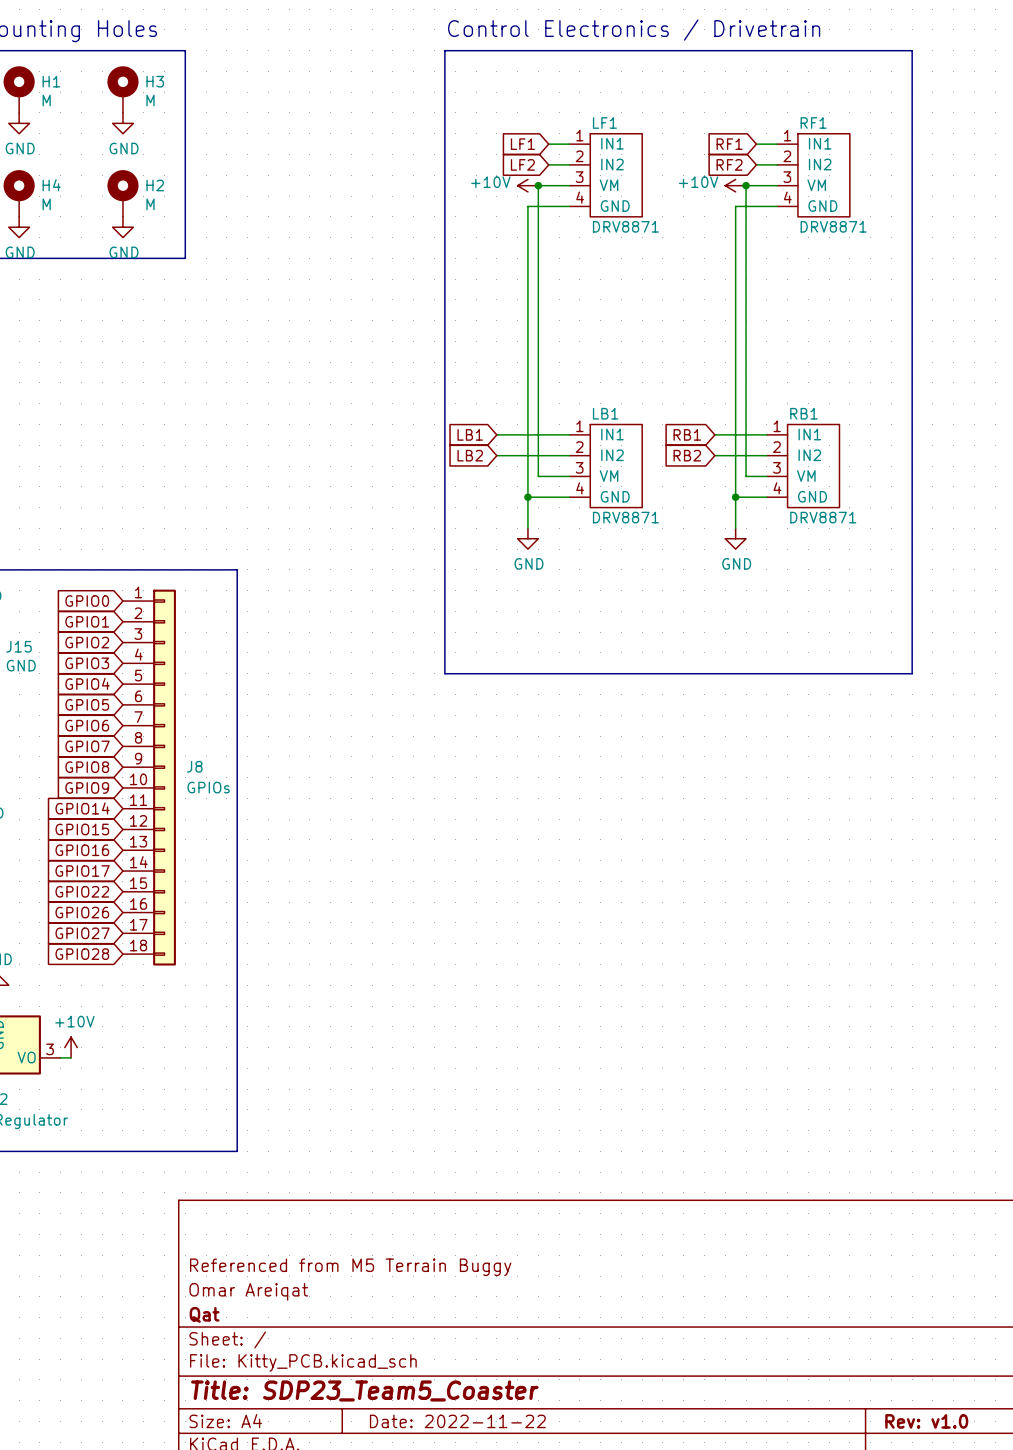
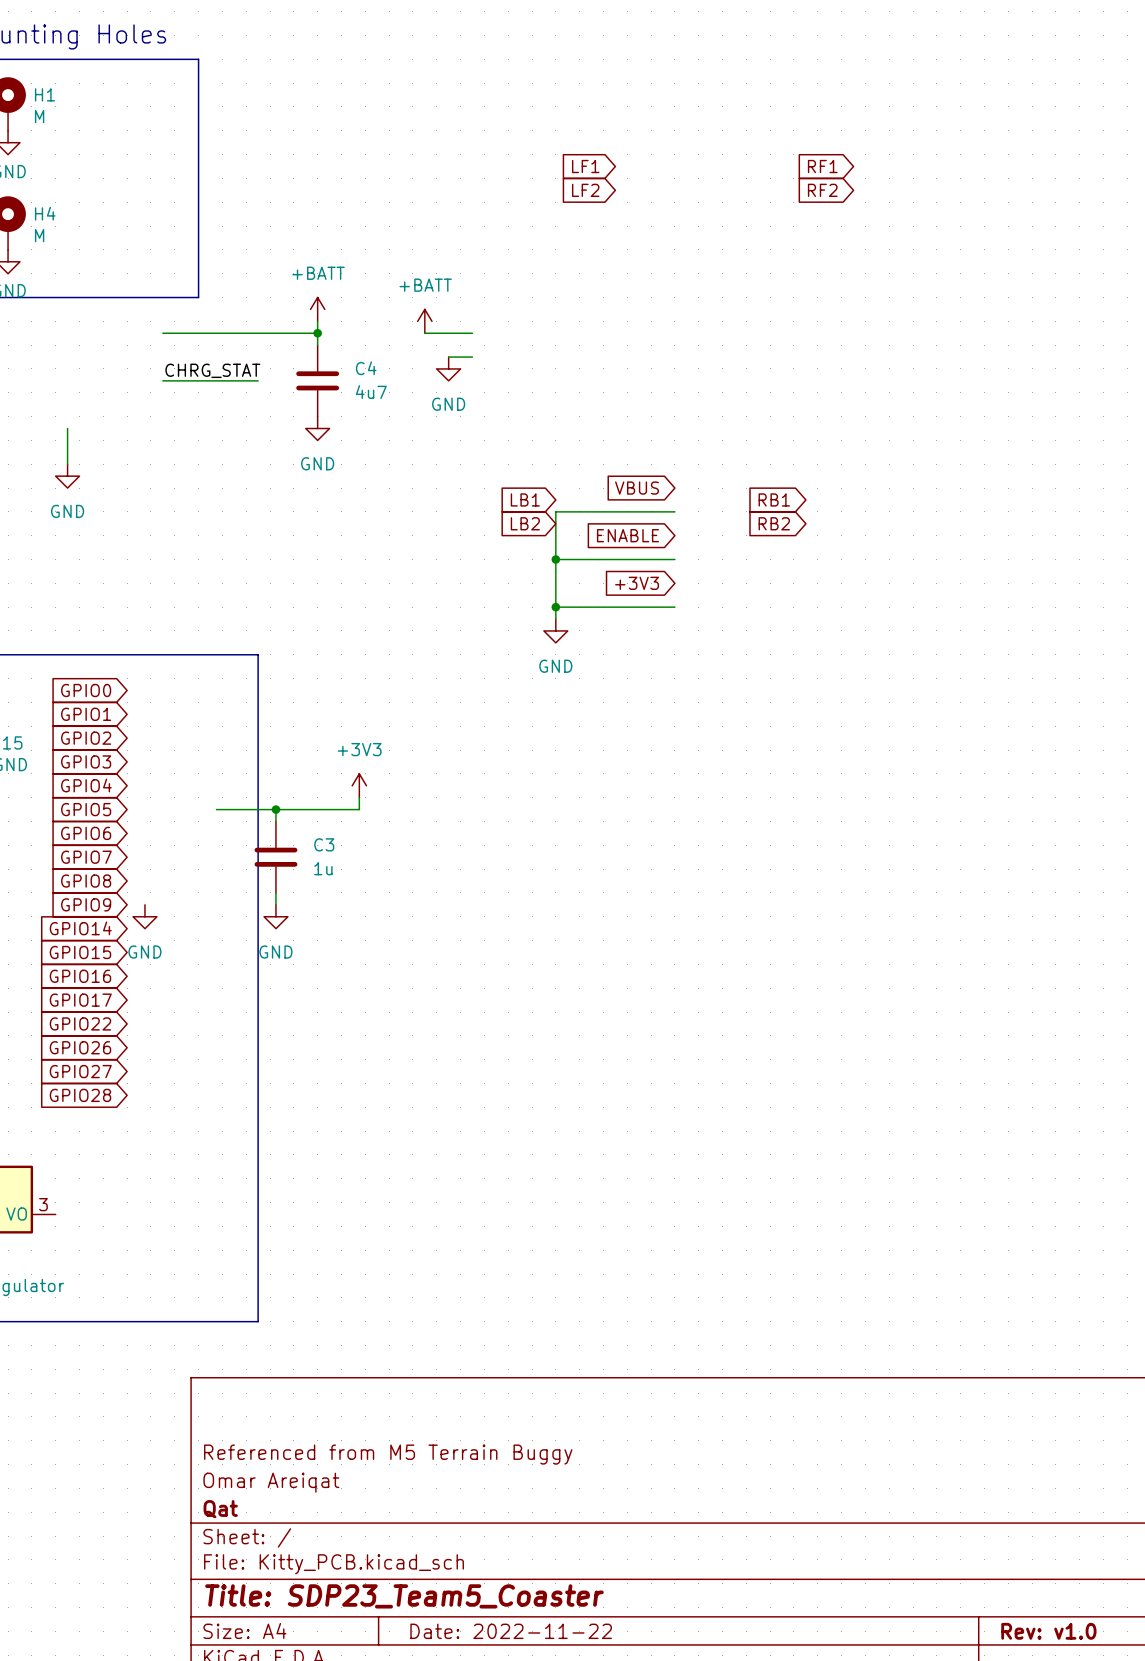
text: Control Electronics / Drivetrain (634, 30) -> none
line: (444, 50) (912, 50) (912, 673) (444, 673) (444, 50) -> none
H3: M (122, 89) -> none
power symbol: GND (122, 123) -> none
wire: (548, 144) (569, 144) -> none
wire: (756, 144) (777, 144) -> none
wire: (548, 164) (569, 164) -> none
wire: (756, 164) (777, 164) -> none
LF1: DRV8871 (605, 175) -> none
RF1: DRV8871 (813, 175) -> none
power symbol: +10V (527, 185) -> none
junction: (538, 185) -> none
wire: (569, 185) (538, 185) (538, 476) (569, 476) -> none
power symbol: +10V (735, 185) -> none
junction: (746, 185) -> none
wire: (777, 185) (746, 185) (746, 476) (766, 476) -> none
H2: M (122, 193) -> none
wire: (569, 206) (527, 206) (527, 528) -> none
wire: (777, 206) (735, 206) (735, 528) -> none
power symbol: GND (122, 227) -> none
power symbol: none -> +BATT (317, 309)
wire: none -> (317, 321) (317, 345)
power symbol: none -> +BATT (424, 321)
wire: none -> (162, 333) (317, 333)
junction: none -> (317, 333)
wire: none -> (424, 333) (472, 333)
wire: none -> (448, 357) (472, 357)
power symbol: none -> GND (448, 368)
label: none -> CHRG_STAT (212, 370)
wire: none -> (162, 380) (258, 380)
C4: none -> 4u7 (317, 380)
wire: none -> (67, 428) (67, 464)
power symbol: none -> GND (317, 428)
power symbol: none -> GND (67, 476)
global label: none -> VBUS (637, 488)
wire: (496, 434) (569, 434) -> none
wire: (714, 434) (766, 434) -> none
wire: none -> (674, 511) (555, 511) (555, 619)
wire: (496, 455) (569, 455) -> none
wire: (714, 455) (766, 455) -> none
global label: none -> ENABLE (627, 535)
LB1: DRV8871 (605, 466) -> none
RB1: DRV8871 (803, 466) -> none
wire: none -> (555, 559) (674, 559)
junction: none -> (555, 559)
wire: (527, 497) (569, 497) -> none
junction: (527, 497) -> none
wire: (735, 497) (766, 497) -> none
junction: (735, 497) -> none
global label: none -> +3V3 (637, 583)
wire: none -> (555, 607) (674, 607)
junction: none -> (555, 607)
power symbol position: GND (527, 538) -> GND (555, 630)
power symbol: GND (735, 538) -> none
power symbol text position: GND (528, 563) -> GND (555, 666)
power symbol: none -> +3V3 (359, 785)
wire: none -> (359, 797) (359, 809) (216, 809)
wire: none -> (275, 809) (275, 821)
junction: none -> (275, 809)
C3: none -> 1u (275, 857)
J8: GPIOs (149, 777) -> none
wire: none -> (275, 892) (275, 904)
power symbol: none -> GND (144, 916)
power symbol: none -> GND (275, 916)
power symbol: +10V (71, 1047) -> none
wire: (60, 1057) (71, 1057) -> none

